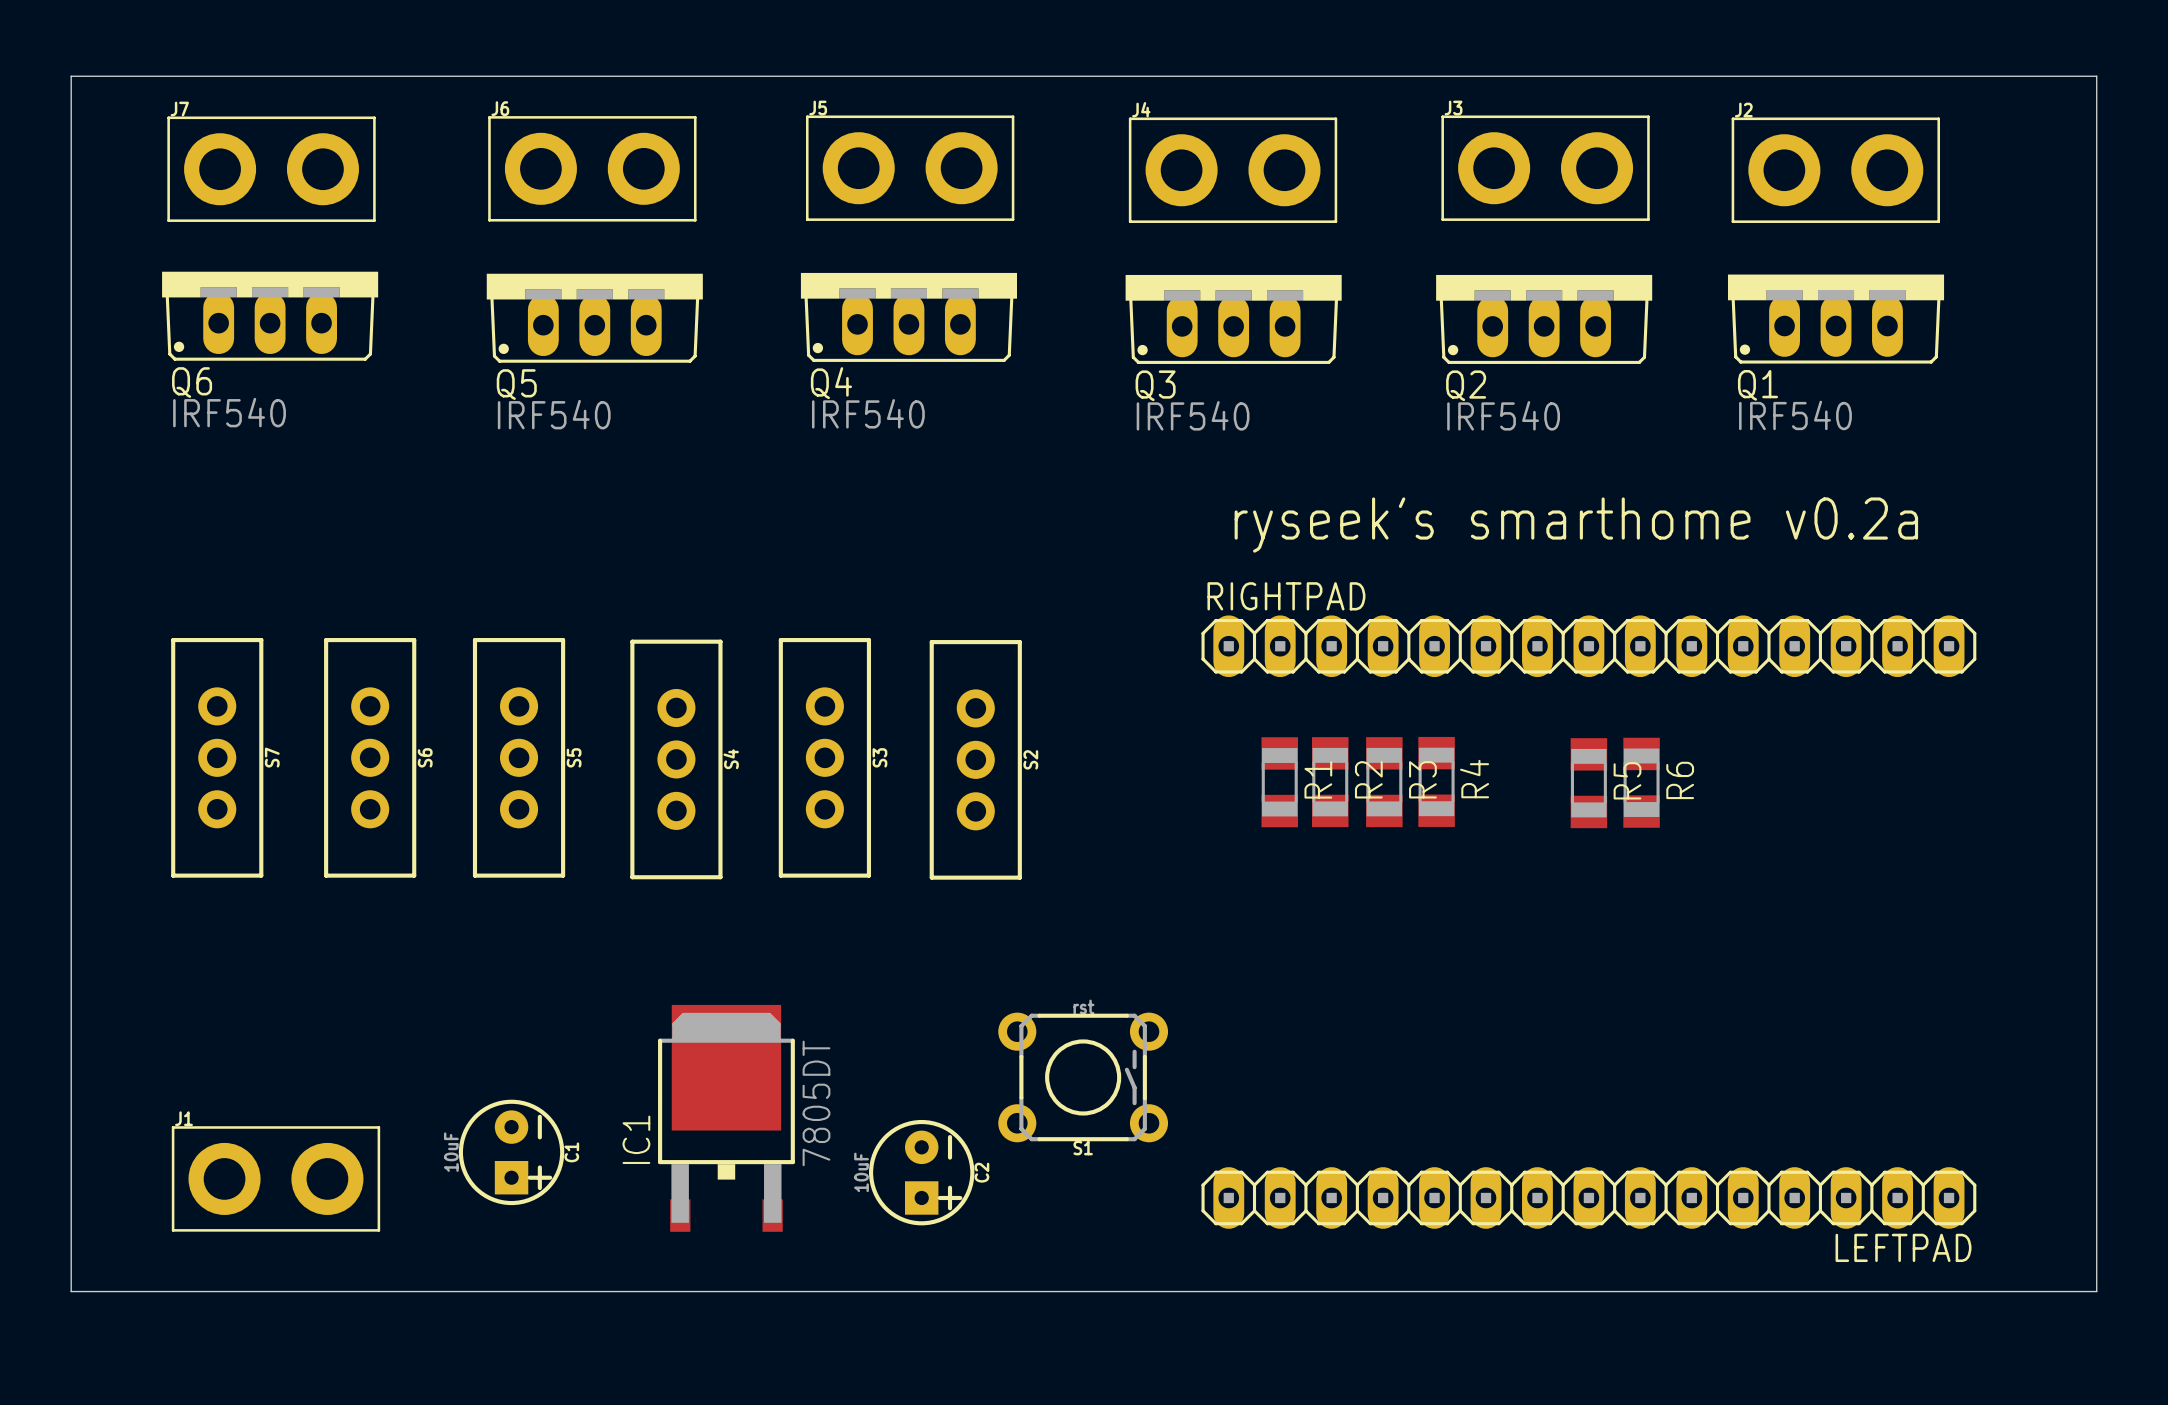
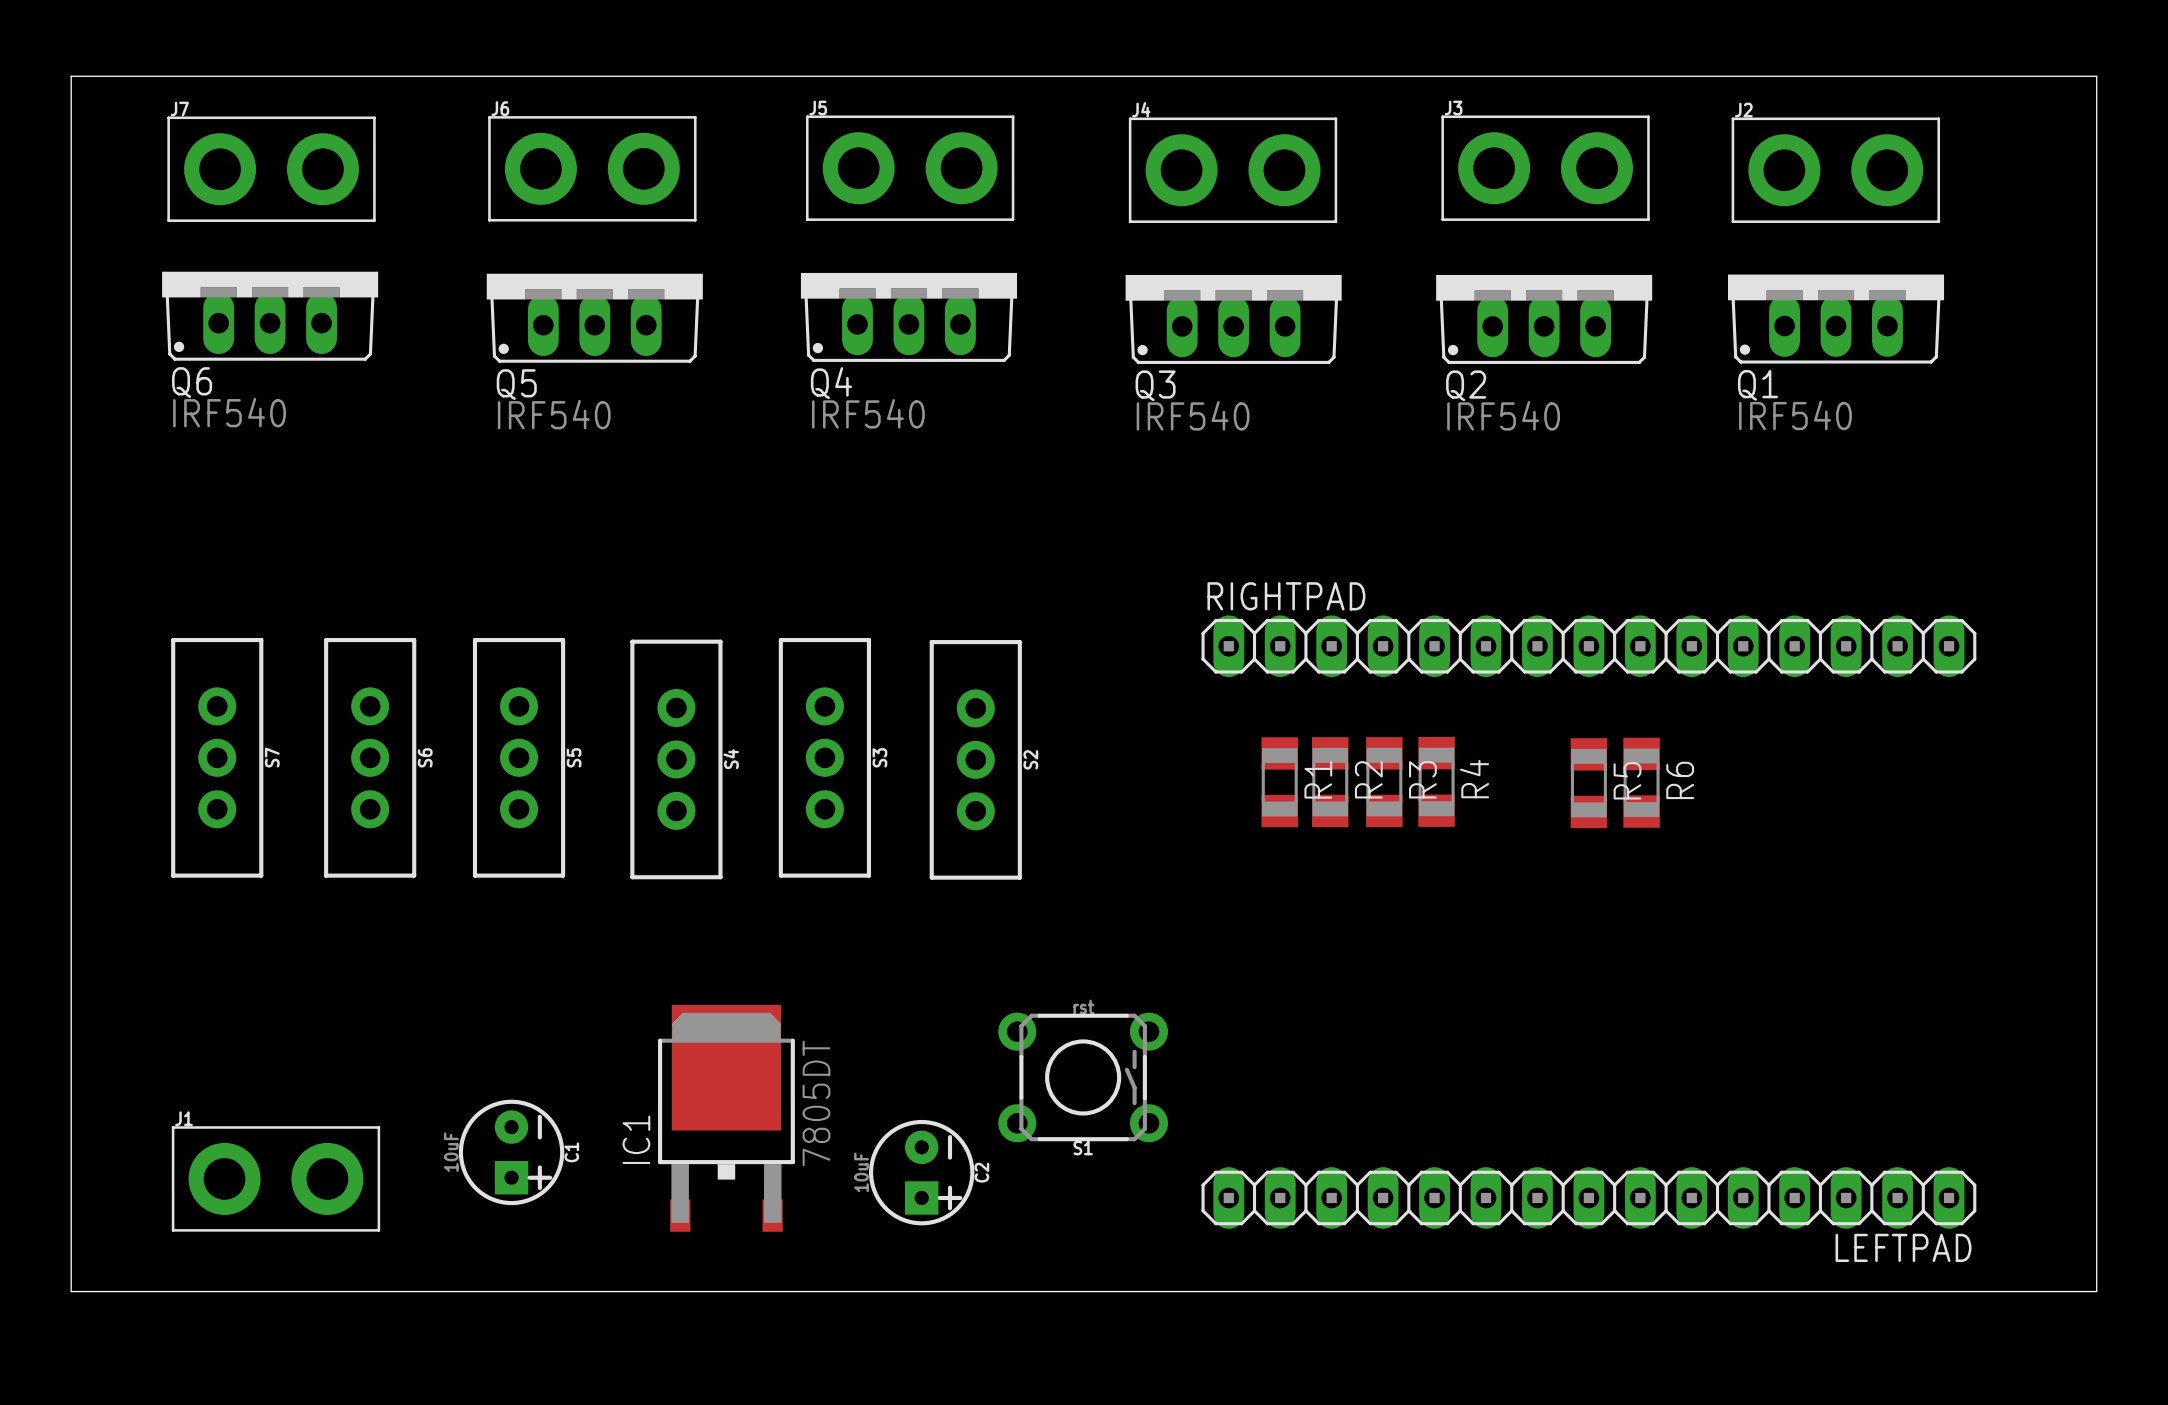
text: ryseek's smarthome v0.2a (1576, 525) -> none

